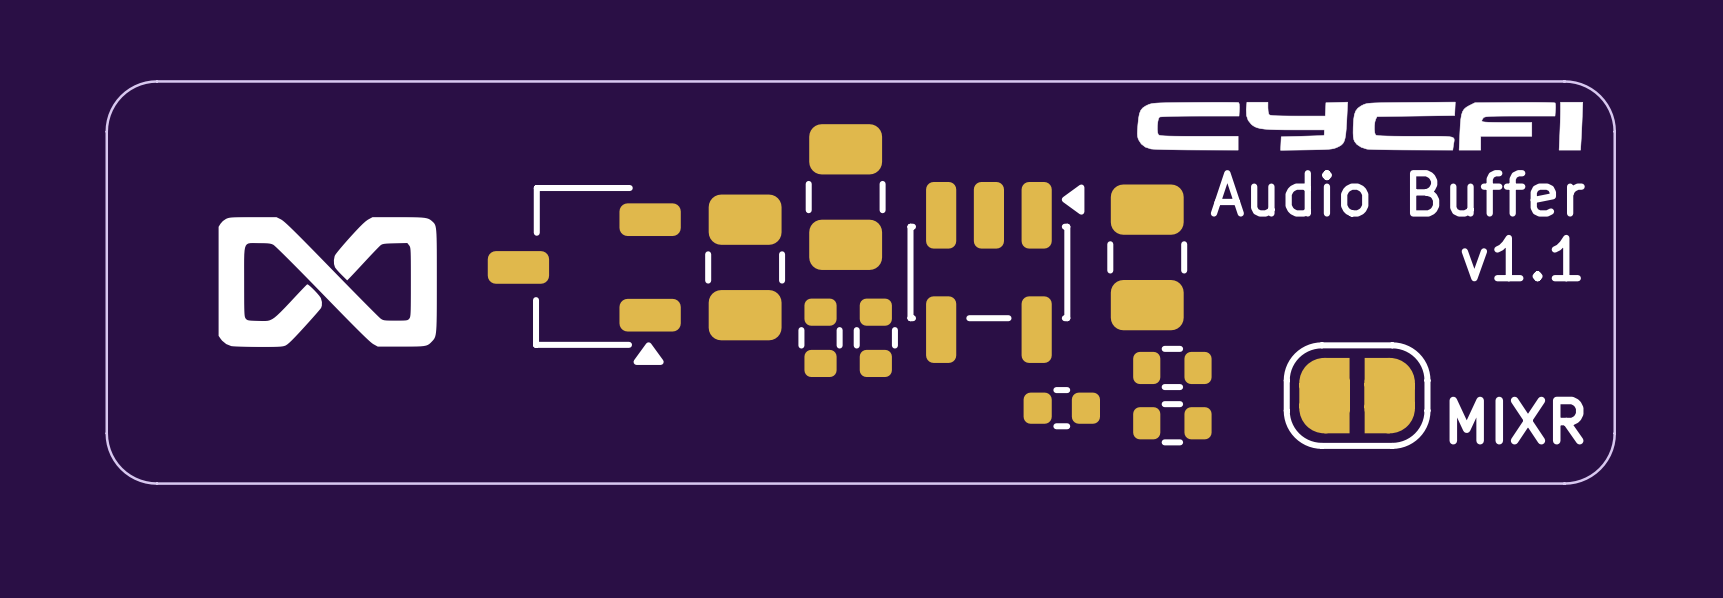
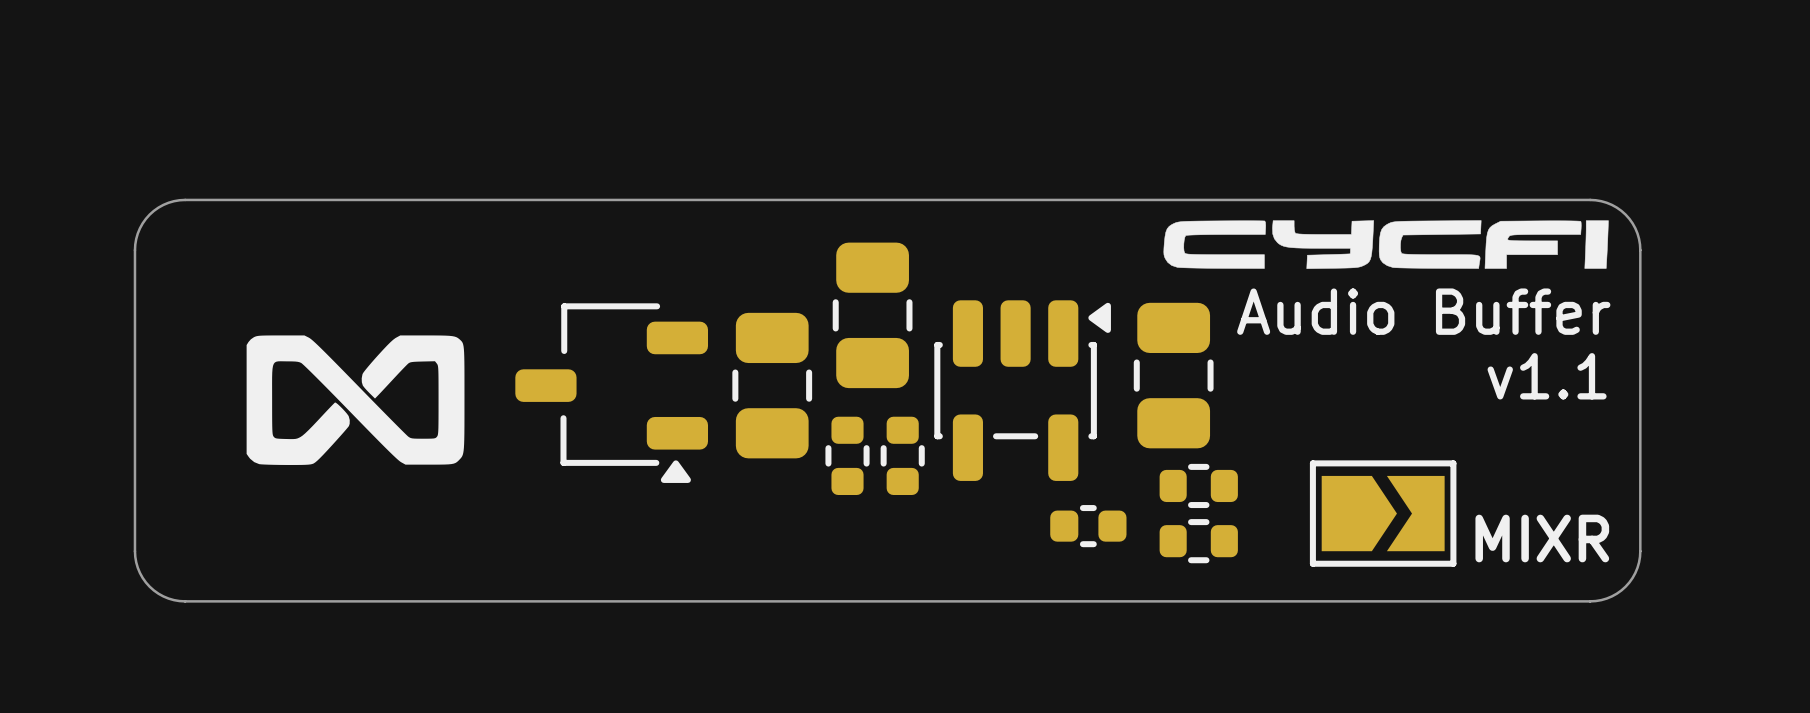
part footprint: [1283, 342, 1431, 449] -> [1309, 460, 1457, 567]

